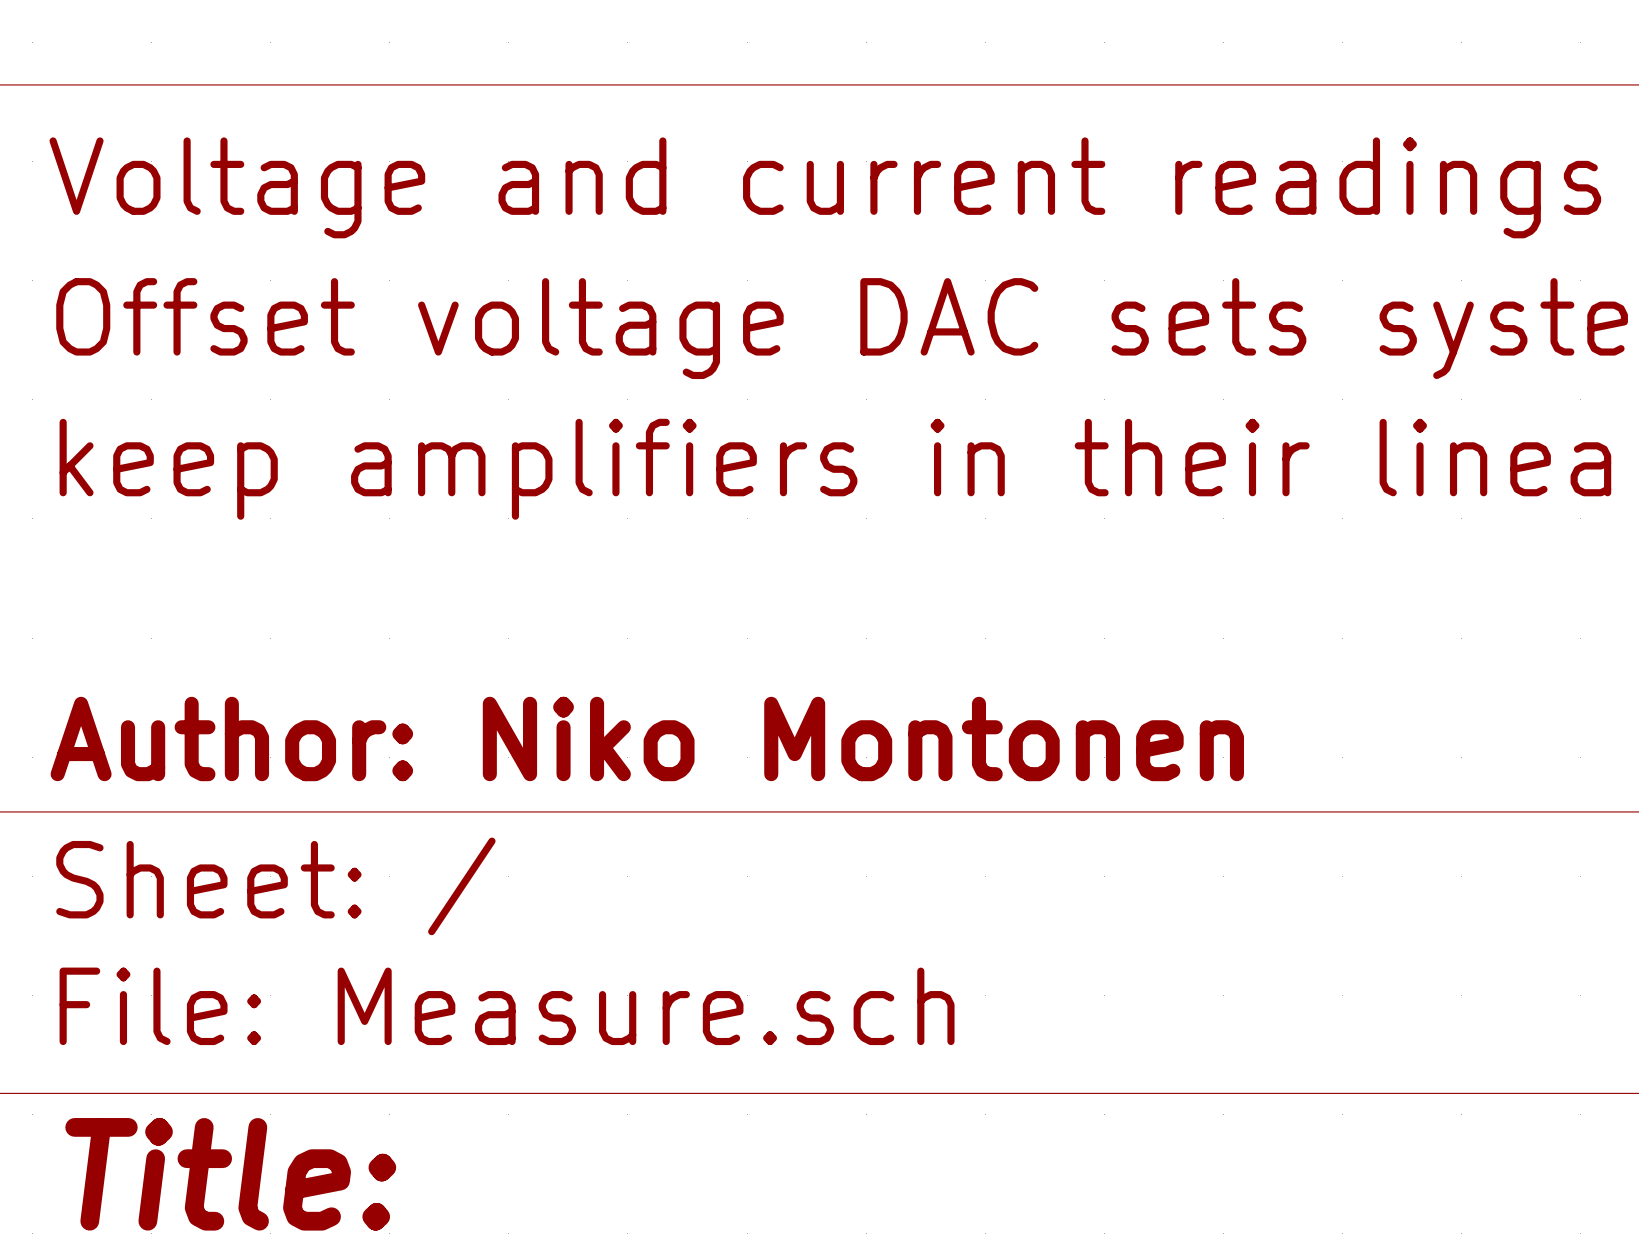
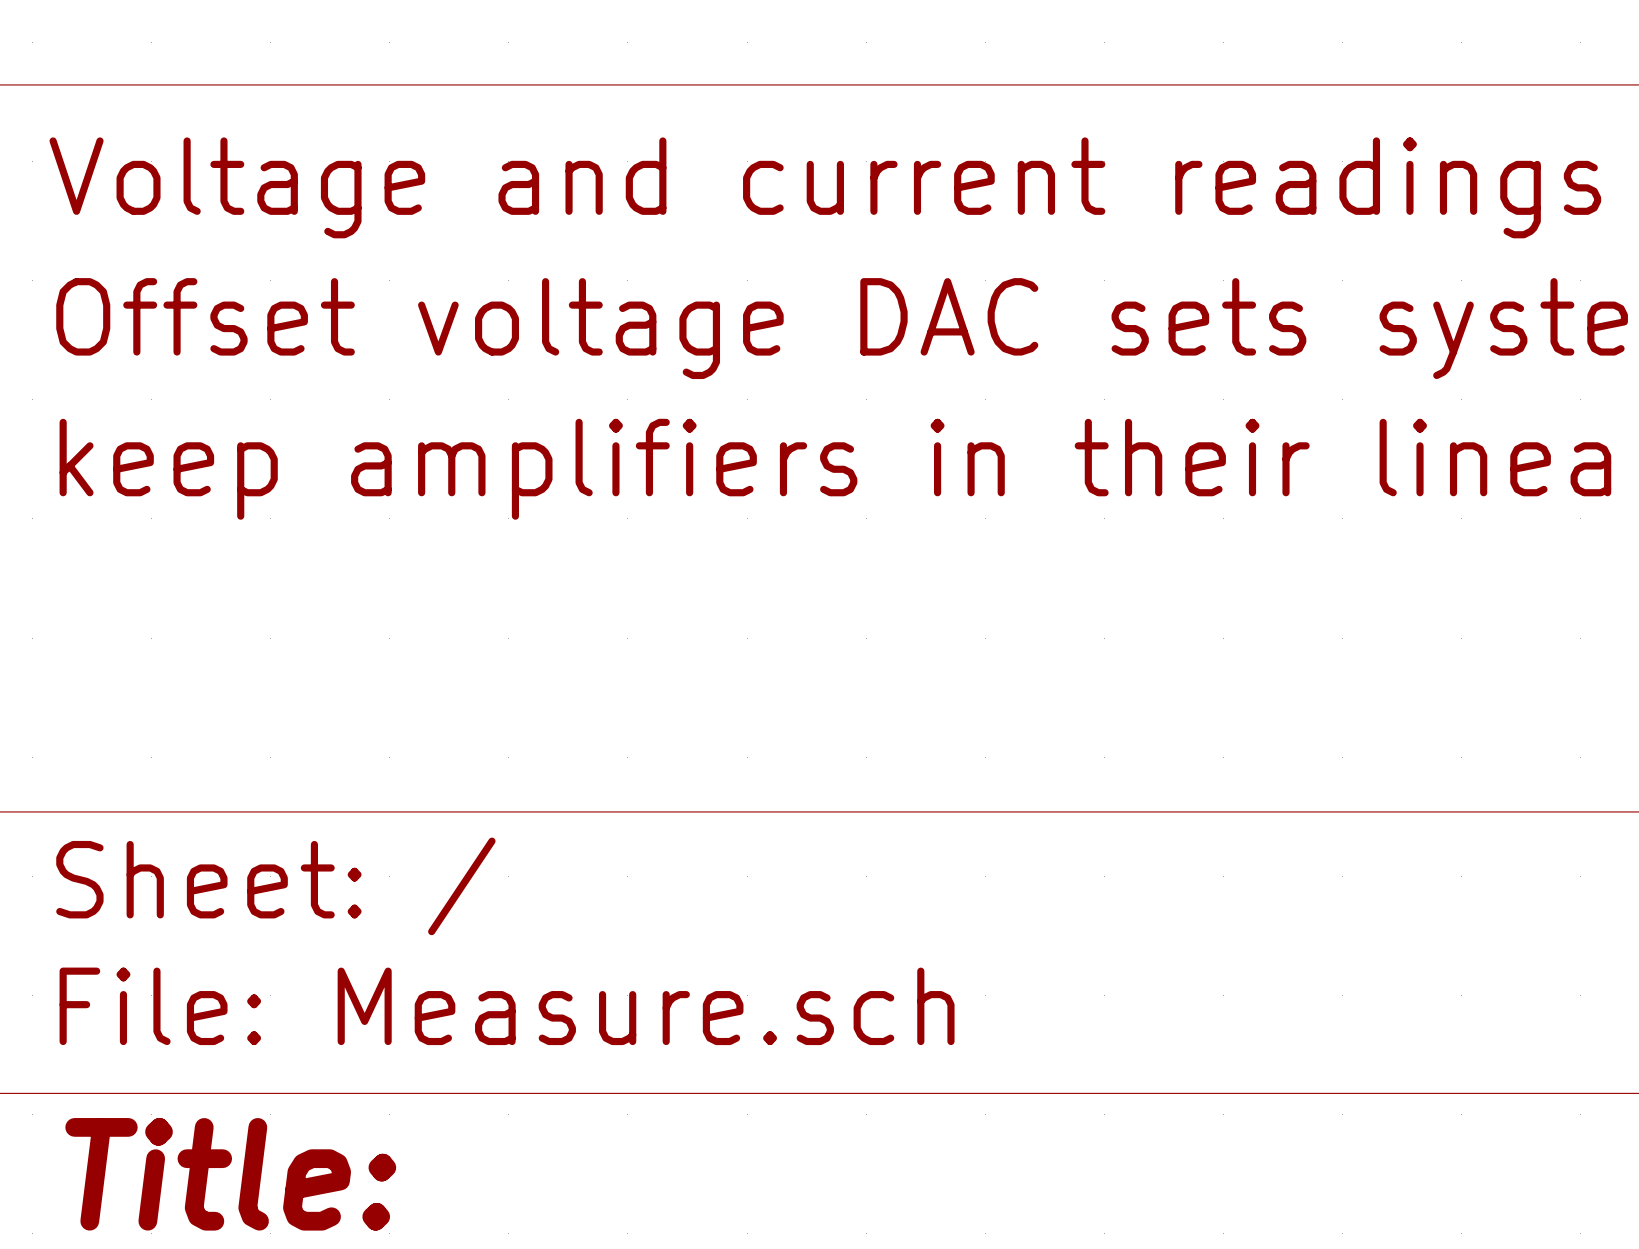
title block: Author: Niko Montonen (647, 738) -> none

